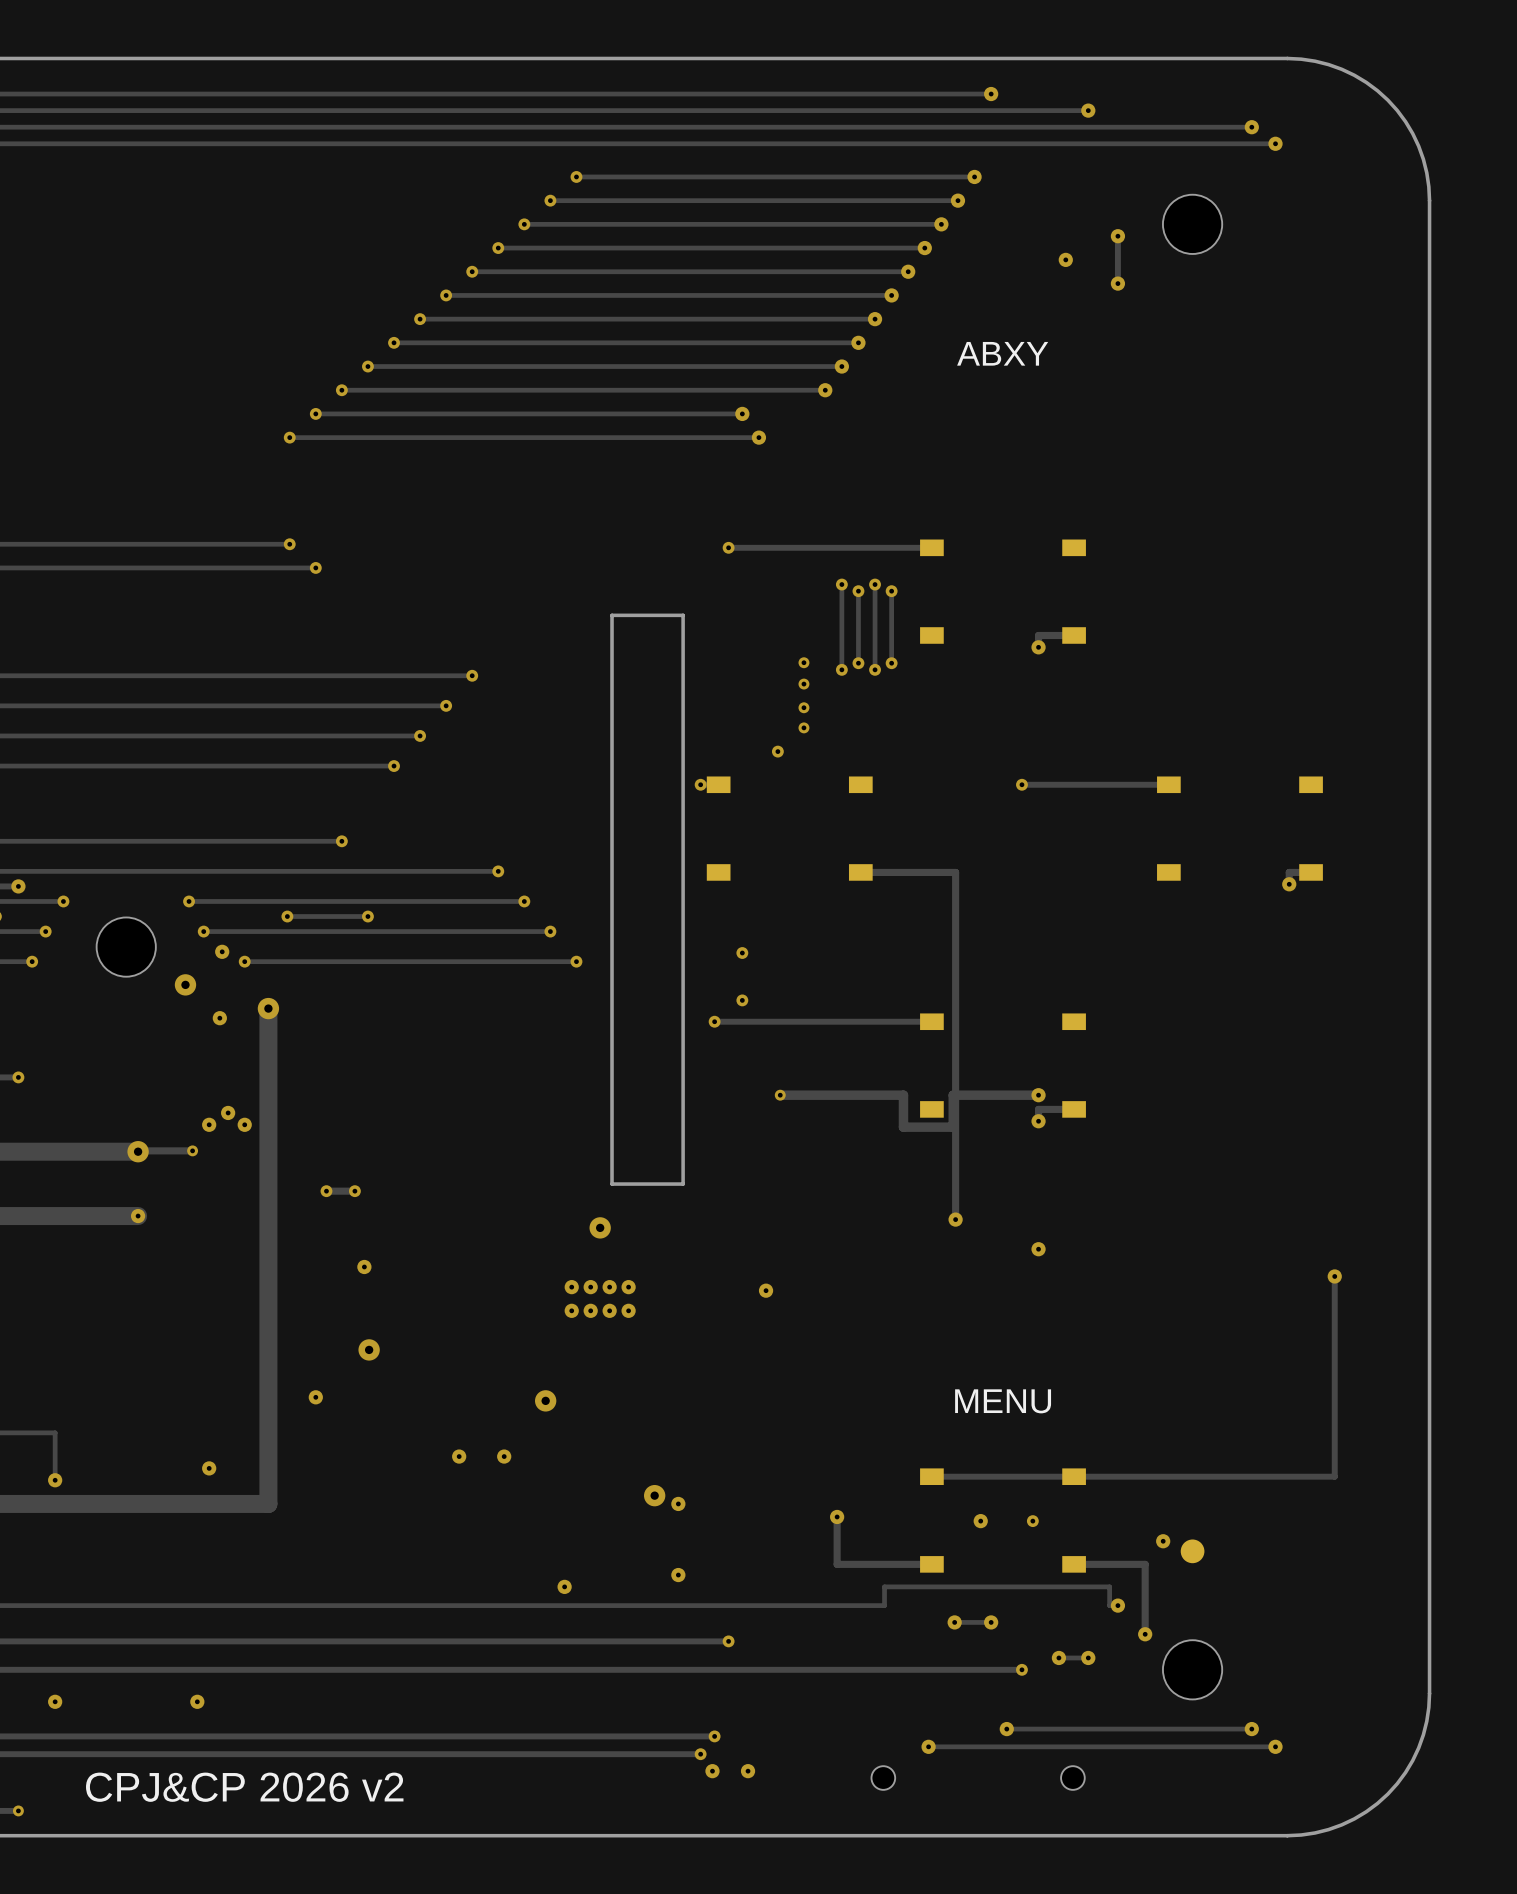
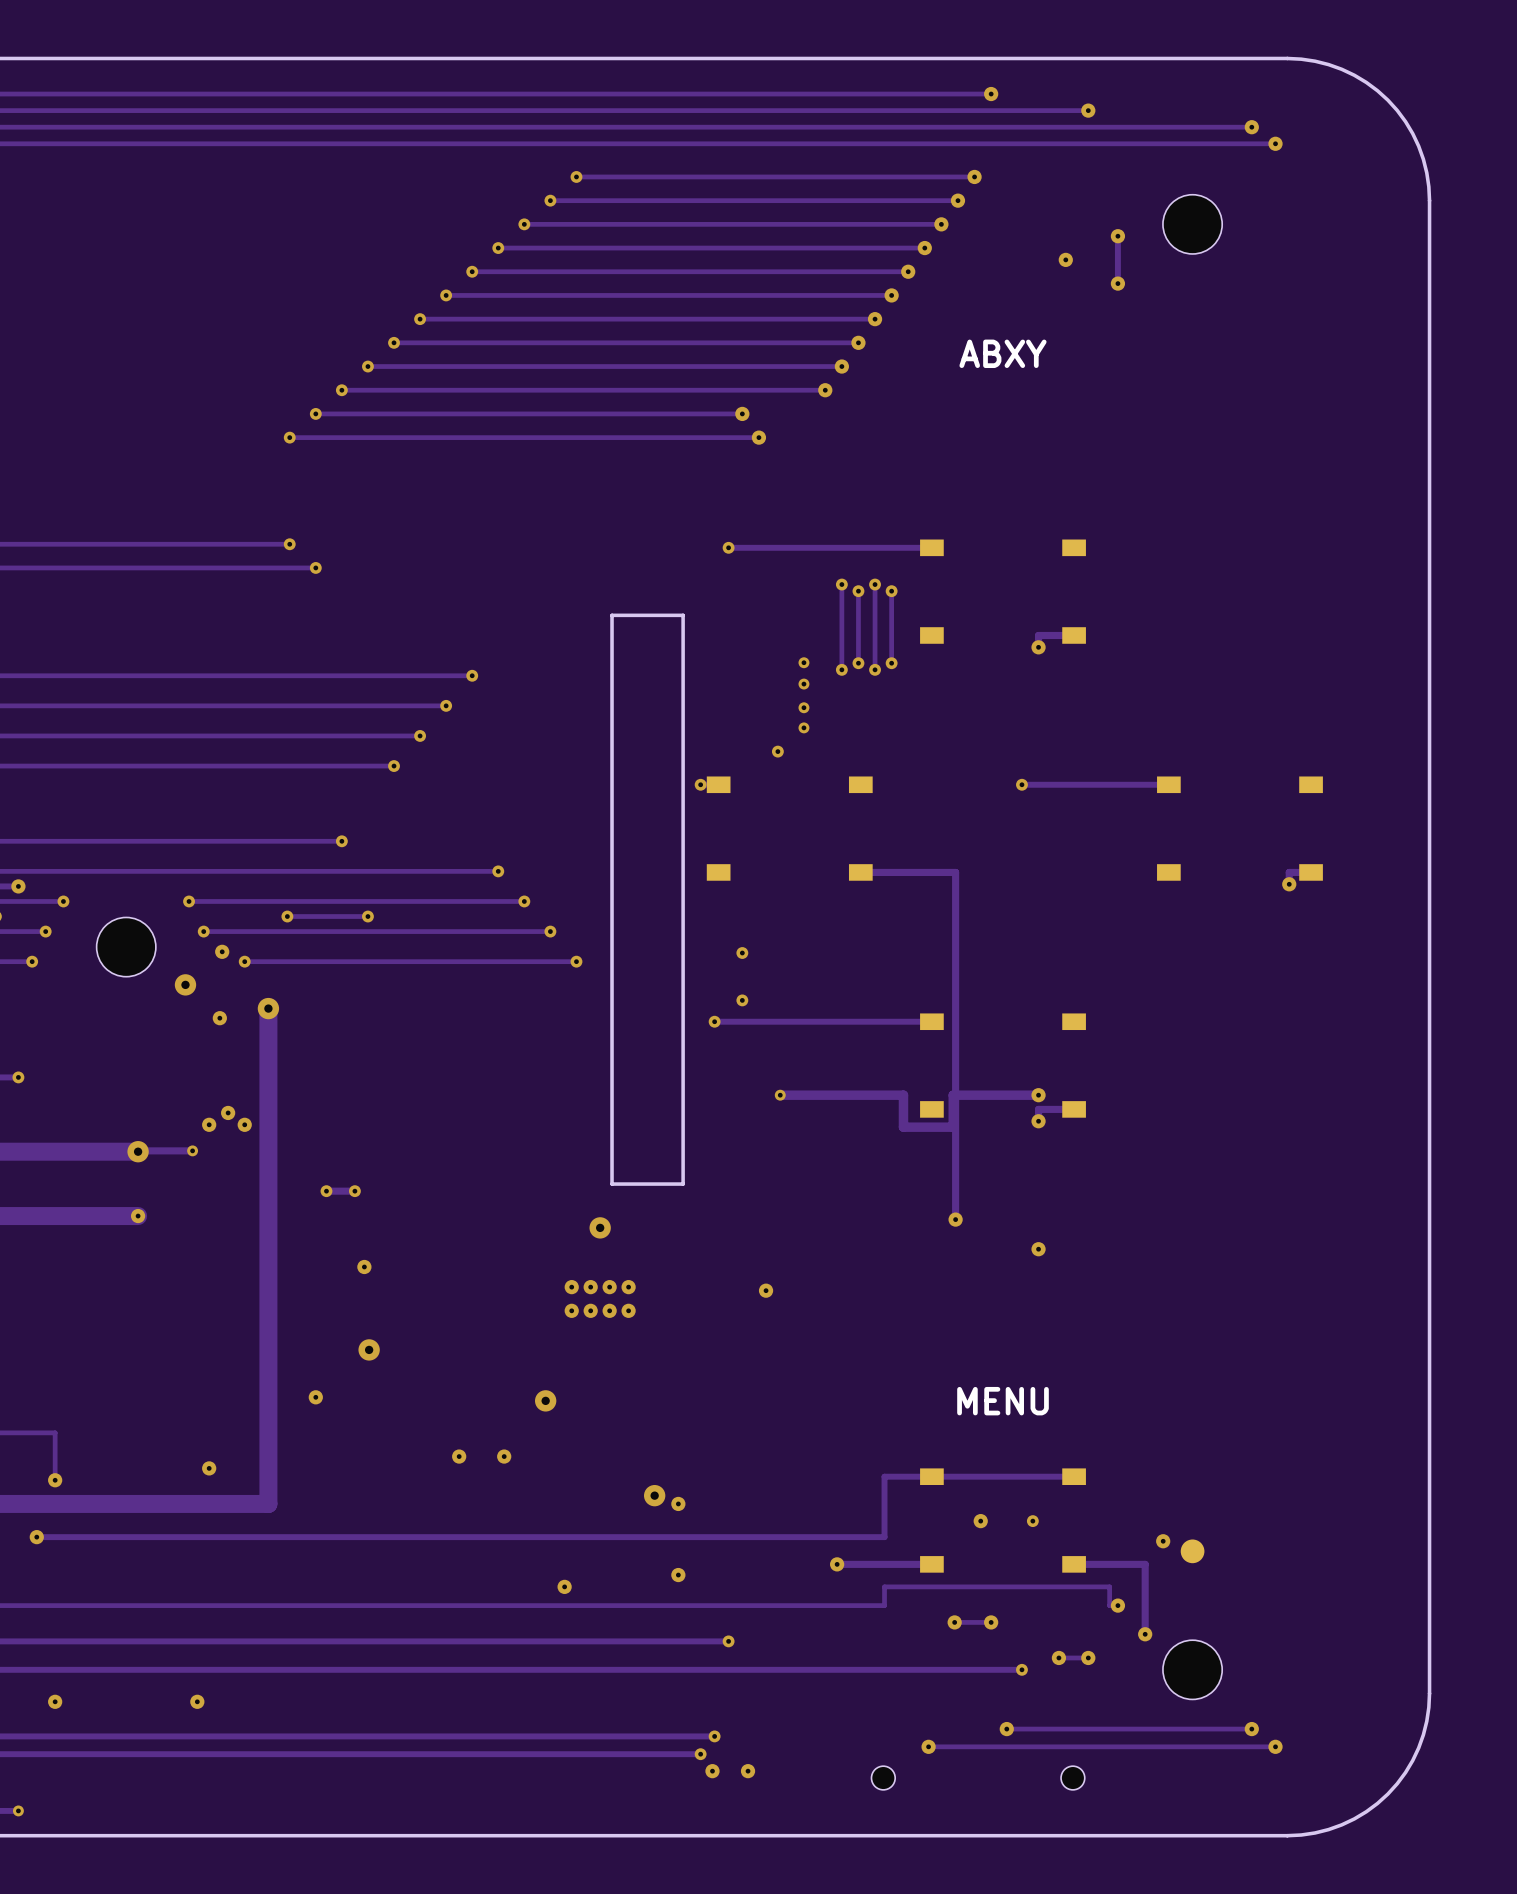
track: (1334, 1276) (1334, 1476) (1074, 1476) -> none
via: (1334, 1276) -> none
track: none -> (931, 1476) (884, 1476) (884, 1537) (36, 1537)
track: (837, 1516) (837, 1564) -> none
via position: (837, 1516) -> (837, 1564)
via: none -> (36, 1537)
text: CPJ&CP 2026 v2 (244, 1787) -> none

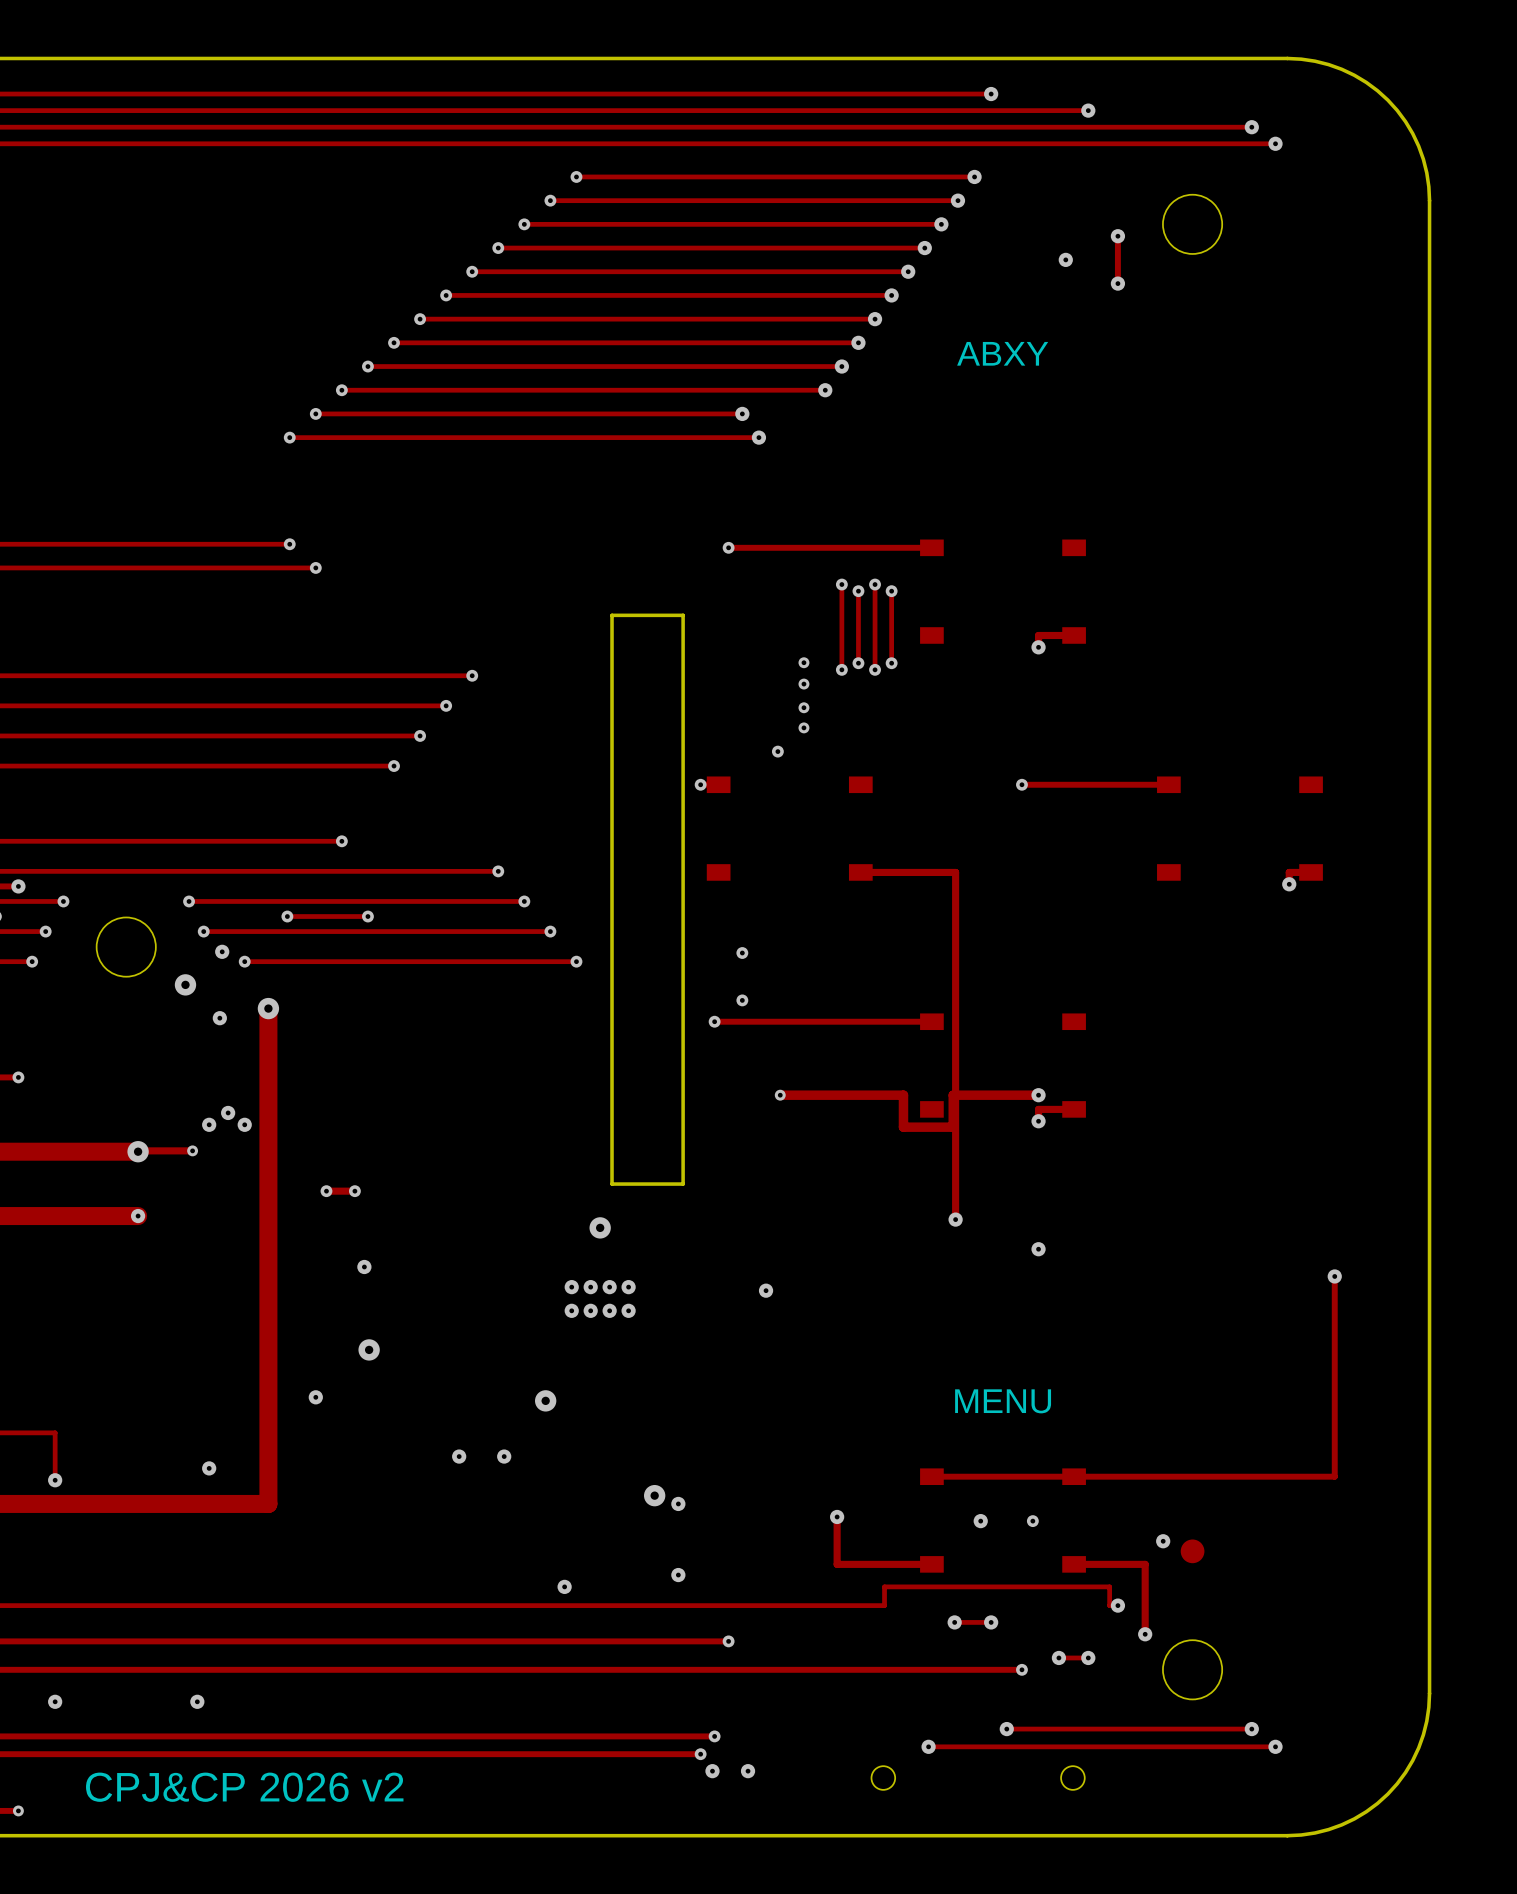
track: none -> (1334, 1276) (1334, 1476) (1074, 1476)
via: none -> (1334, 1276)
track: (931, 1476) (884, 1476) (884, 1537) (36, 1537) -> none
track: none -> (837, 1516) (837, 1564)
via: (36, 1537) -> none
via position: (837, 1564) -> (837, 1516)
text: none -> CPJ&CP 2026 v2 (244, 1787)

